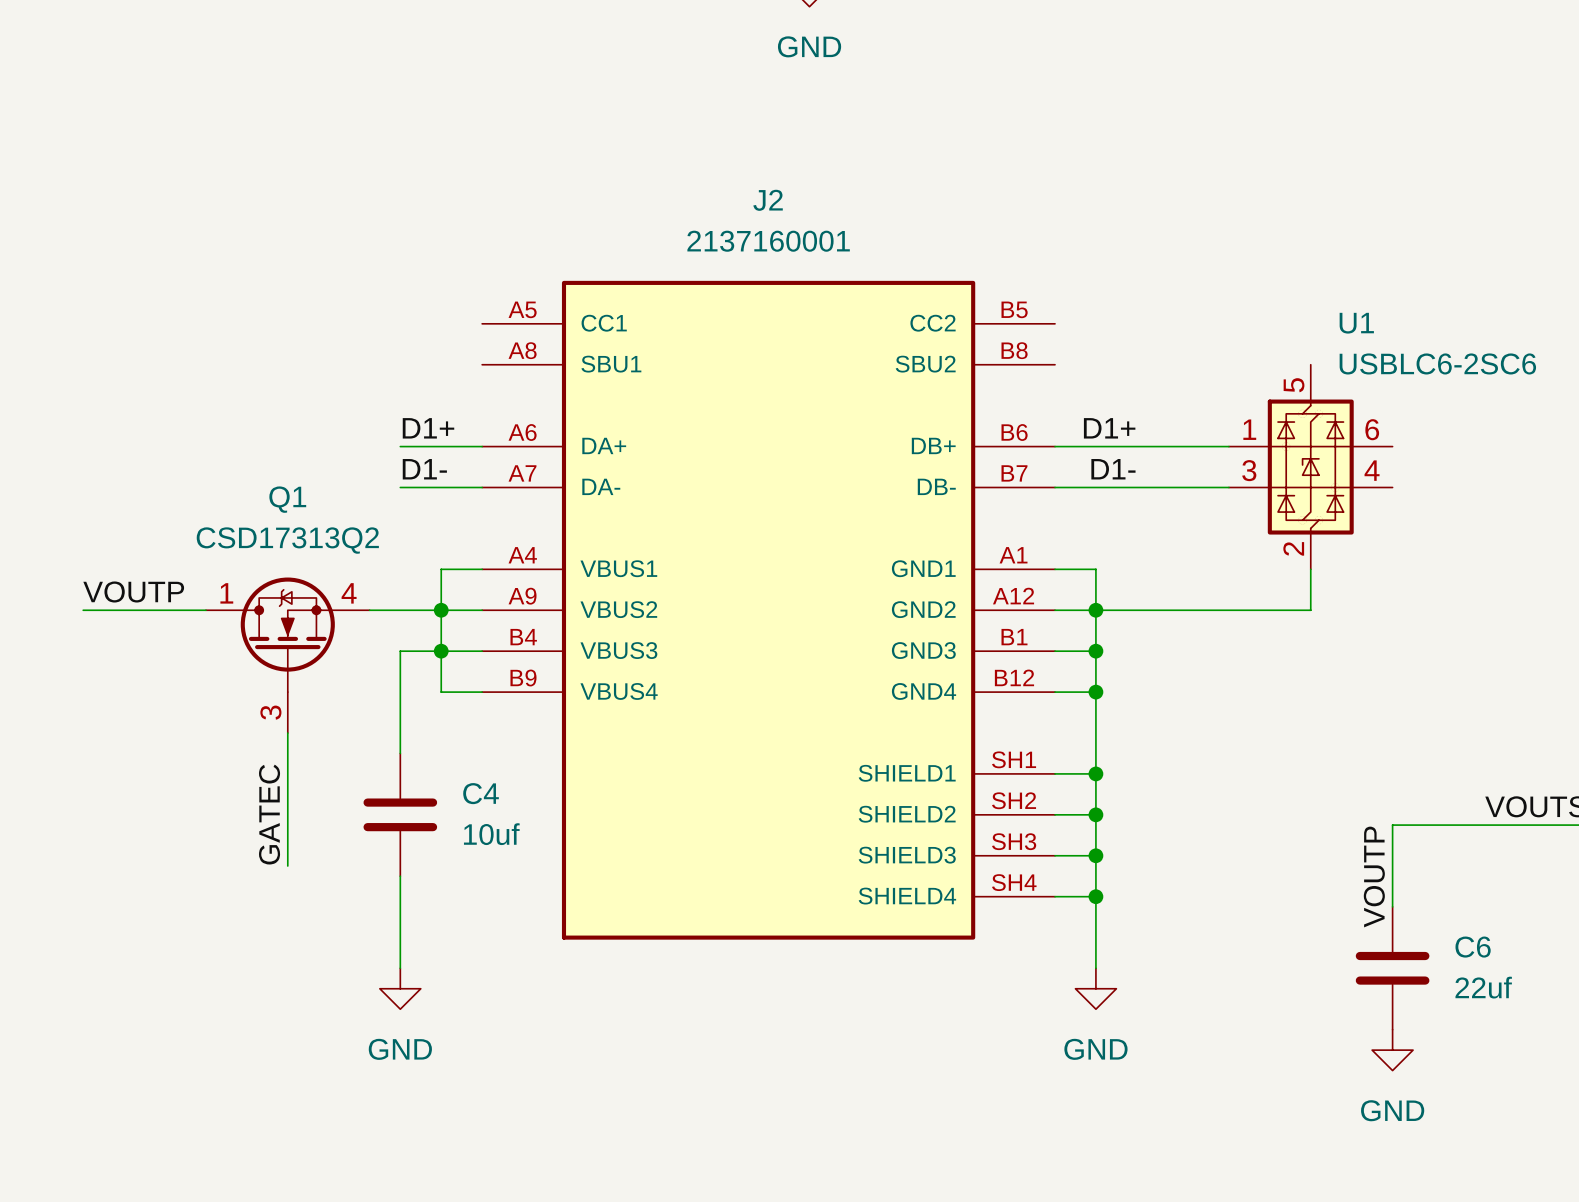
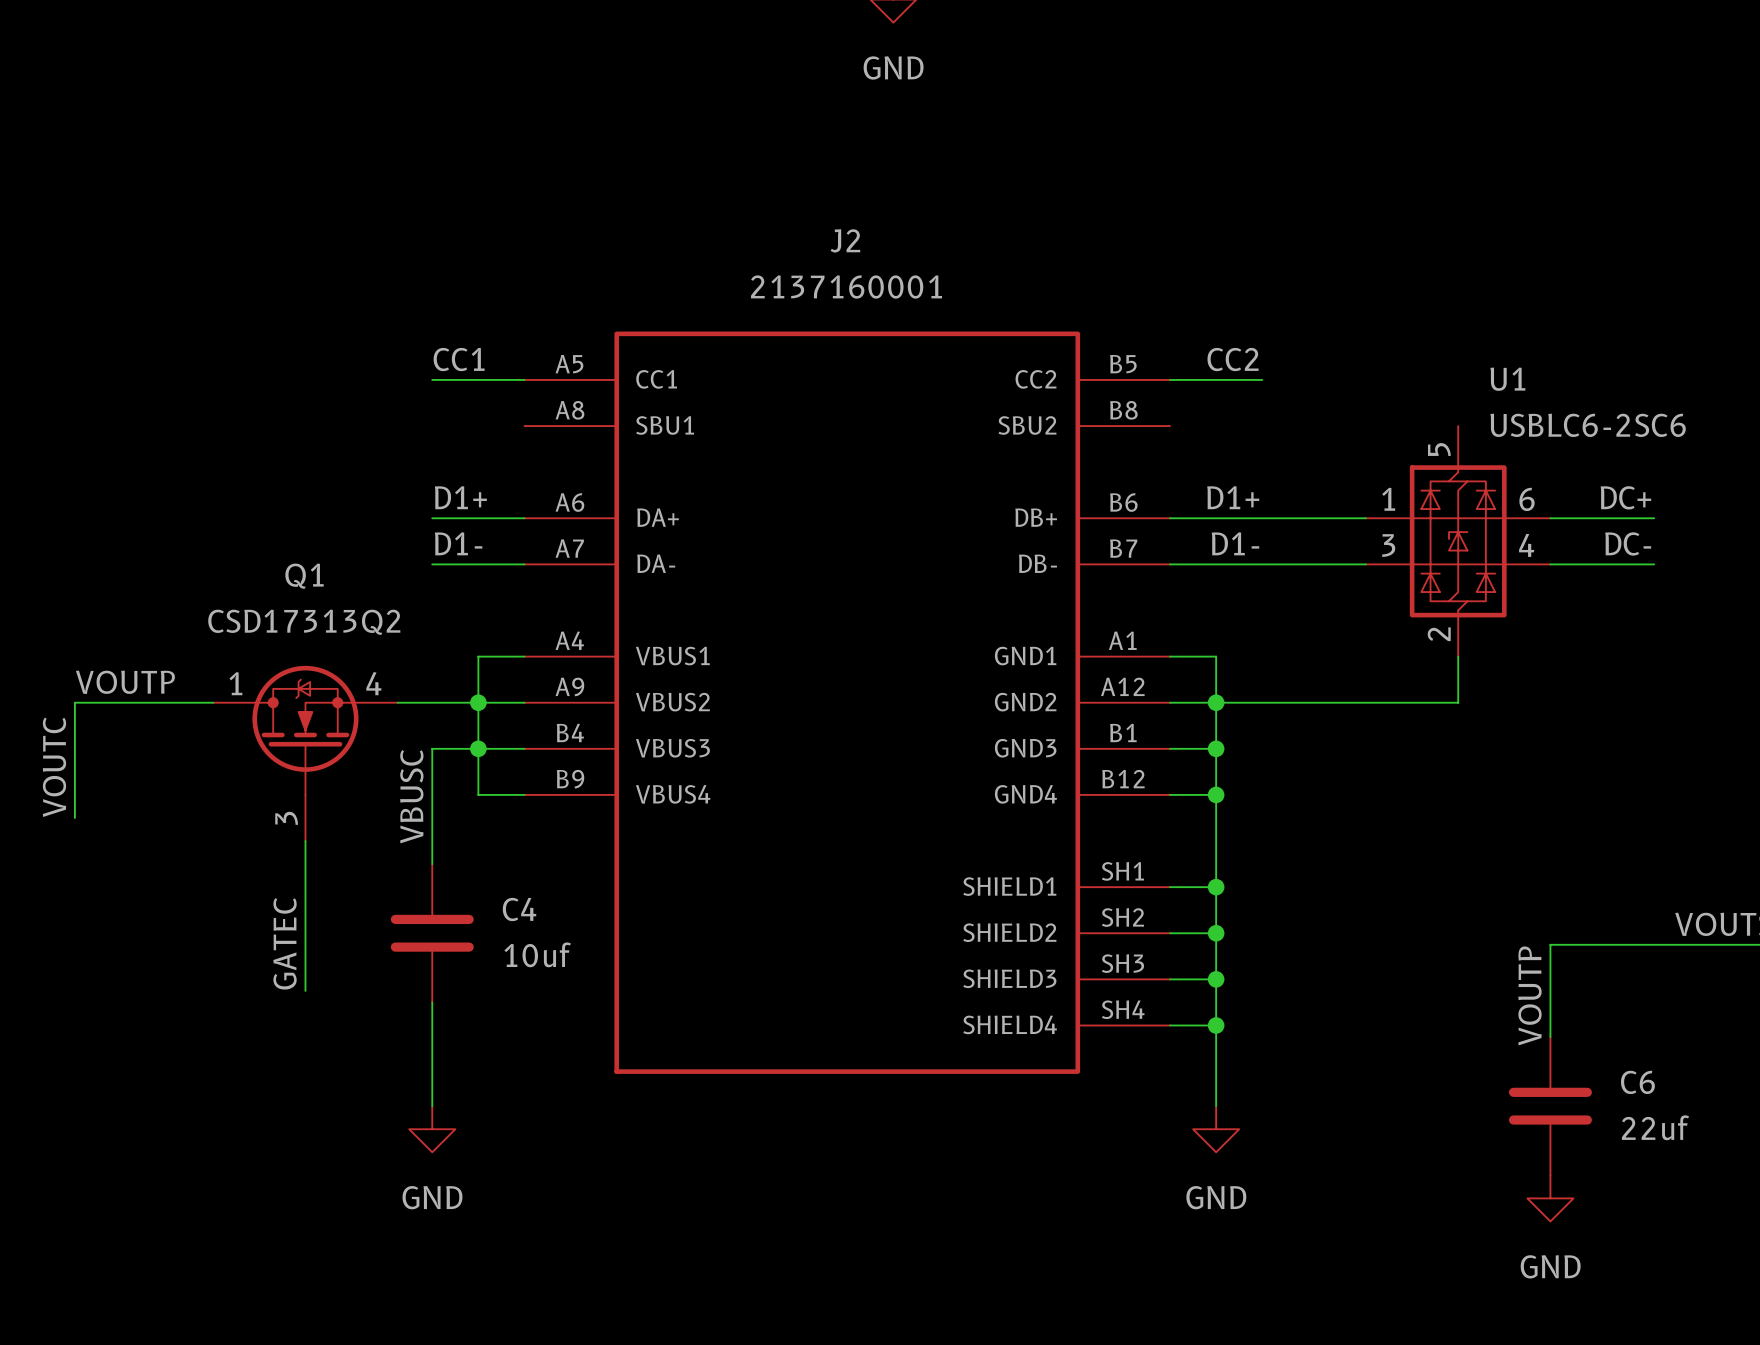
label: none -> CC1 (459, 359)
label: none -> CC2 (1233, 359)
wire: none -> (432, 379) (524, 379)
wire: none -> (1170, 379) (1262, 379)
label: none -> DC+ (1625, 497)
wire: none -> (1550, 518) (1654, 518)
label: none -> DC- (1628, 543)
wire: none -> (1550, 564) (1654, 564)
wire: none -> (74, 702) (74, 817)
label: none -> VOUTC (54, 767)
label: none -> VBUSC (411, 796)

